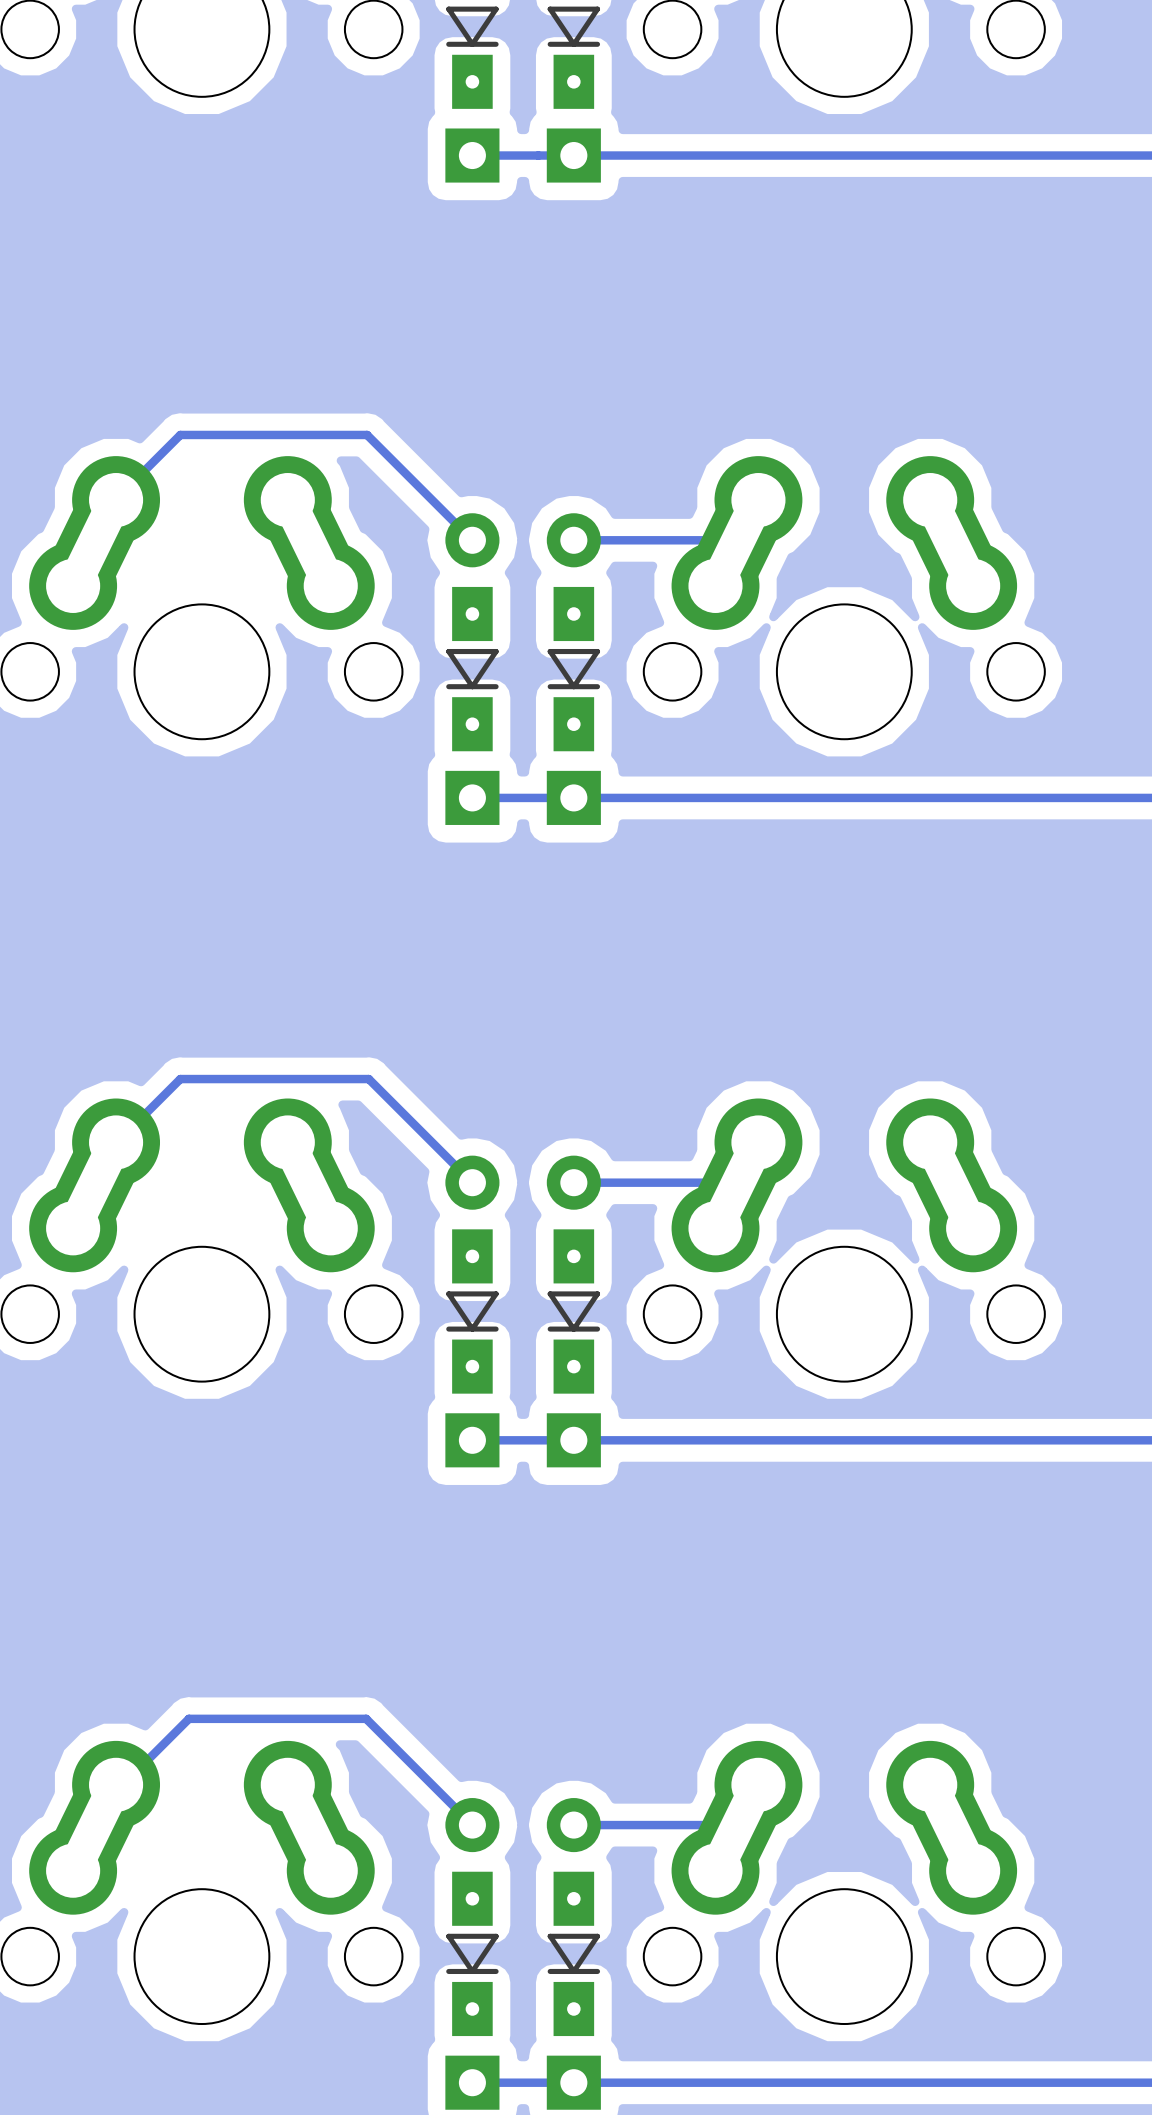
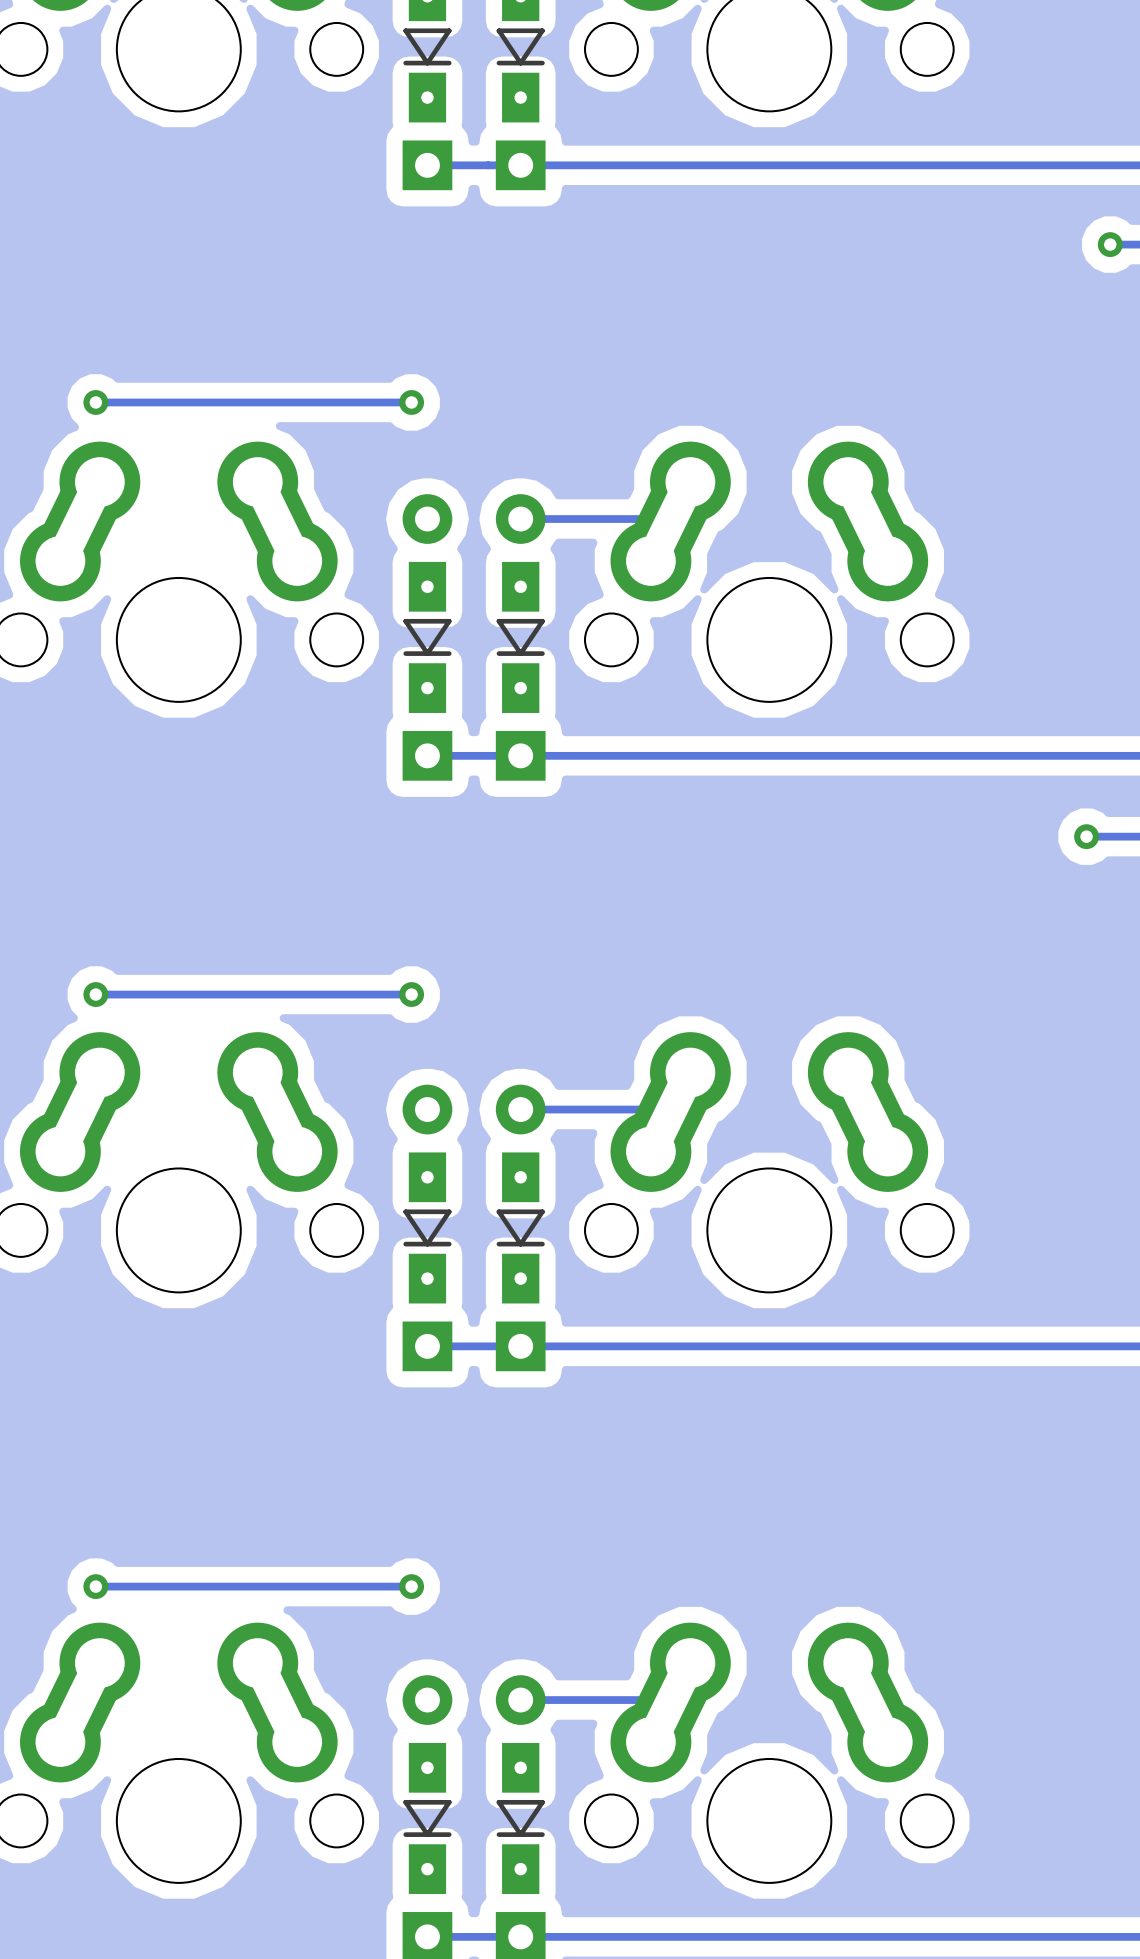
via: none -> (95, 402)
track: none -> (411, 402) (95, 402)
via: none -> (411, 402)
track: (116, 500) (180, 434) (367, 434) (472, 540) -> none
via: none -> (95, 994)
track: none -> (411, 994) (95, 994)
via: none -> (411, 994)
track: (116, 1142) (180, 1079) (368, 1079) (472, 1182) -> none
via: none -> (95, 1586)
track: none -> (411, 1586) (95, 1586)
via: none -> (411, 1586)
track: (472, 1825) (366, 1718) (188, 1718) (94, 1813) (94, 1827) -> none

